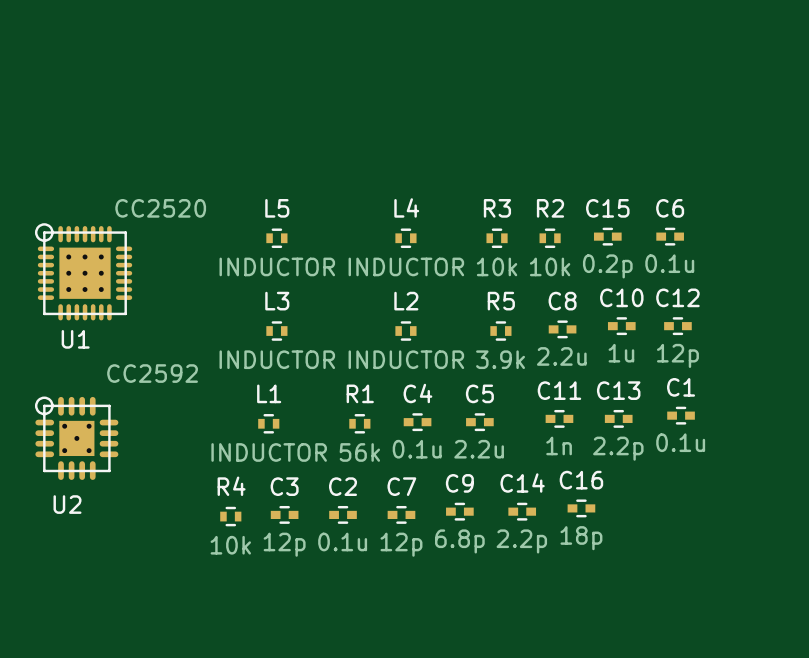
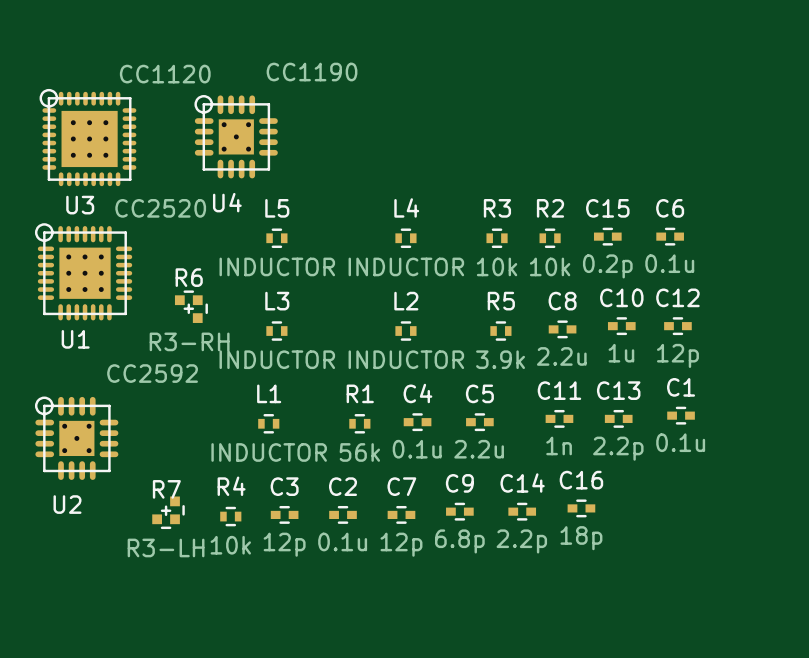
U4: none -> CC1190 (236, 136)
U3: none -> CC1120 (87, 137)
R6: none -> R3-RH (191, 306)
R7: none -> R3-LH (168, 512)

